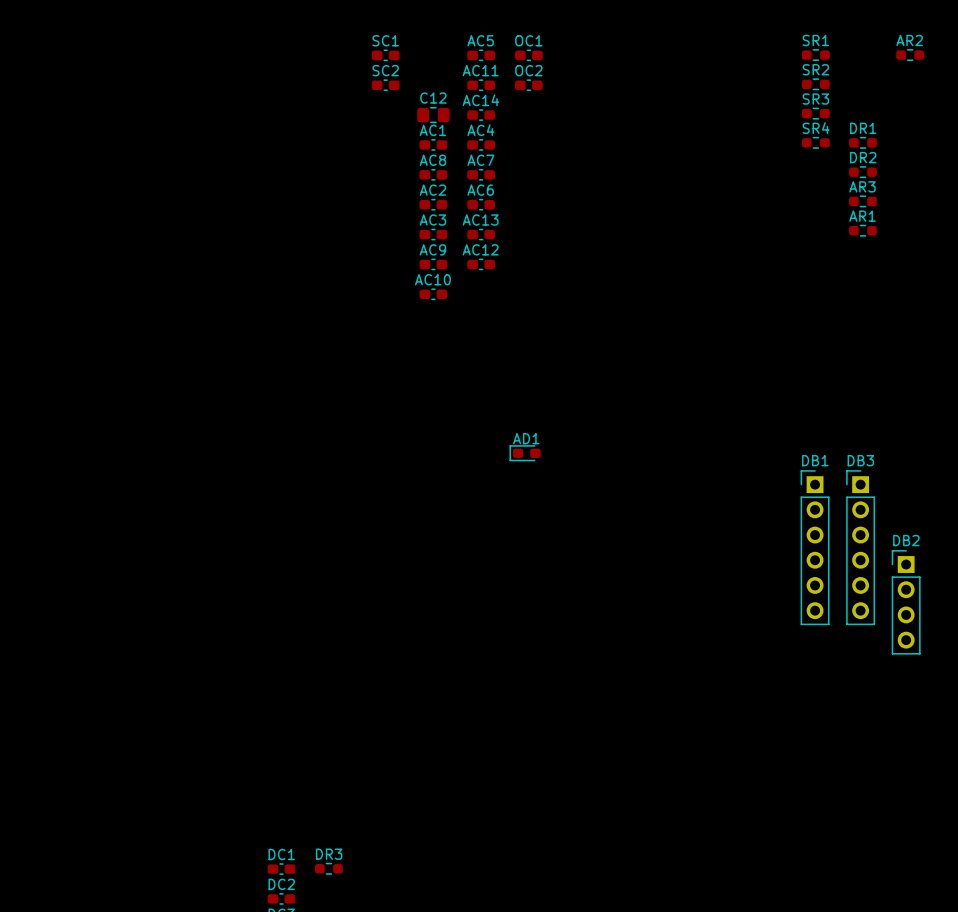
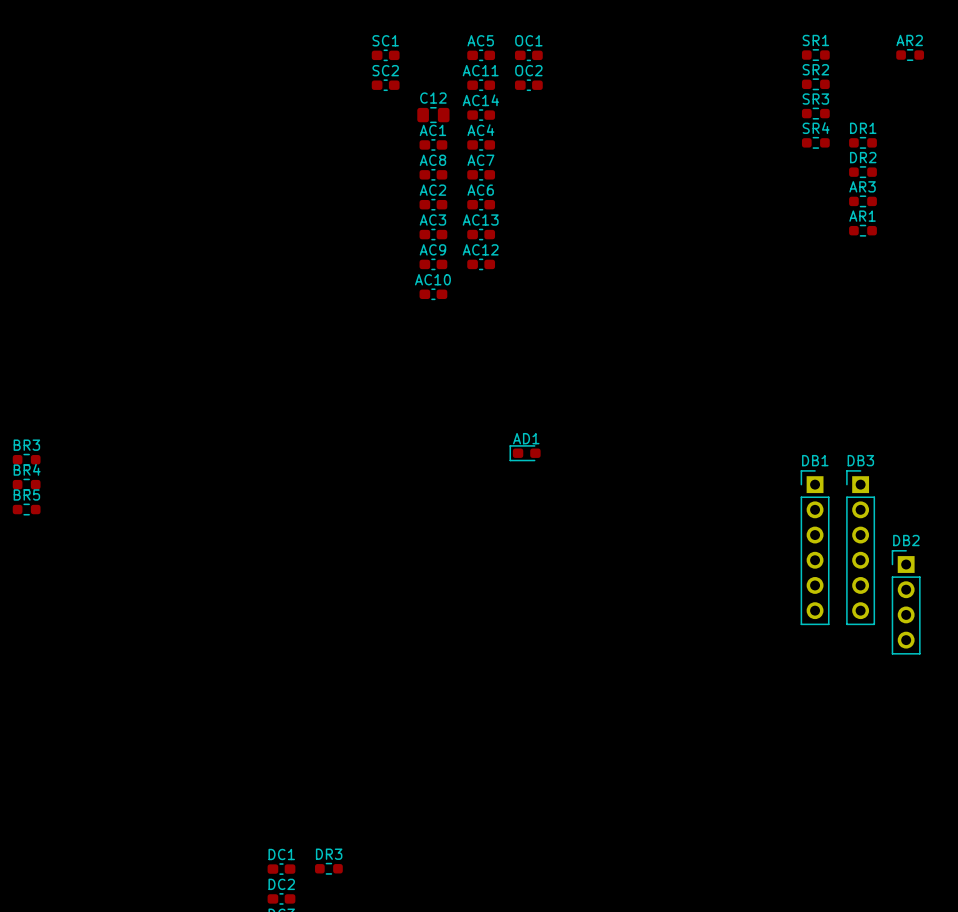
BR3: none -> (26, 459)
BR4: none -> (26, 484)
BR5: none -> (26, 509)

